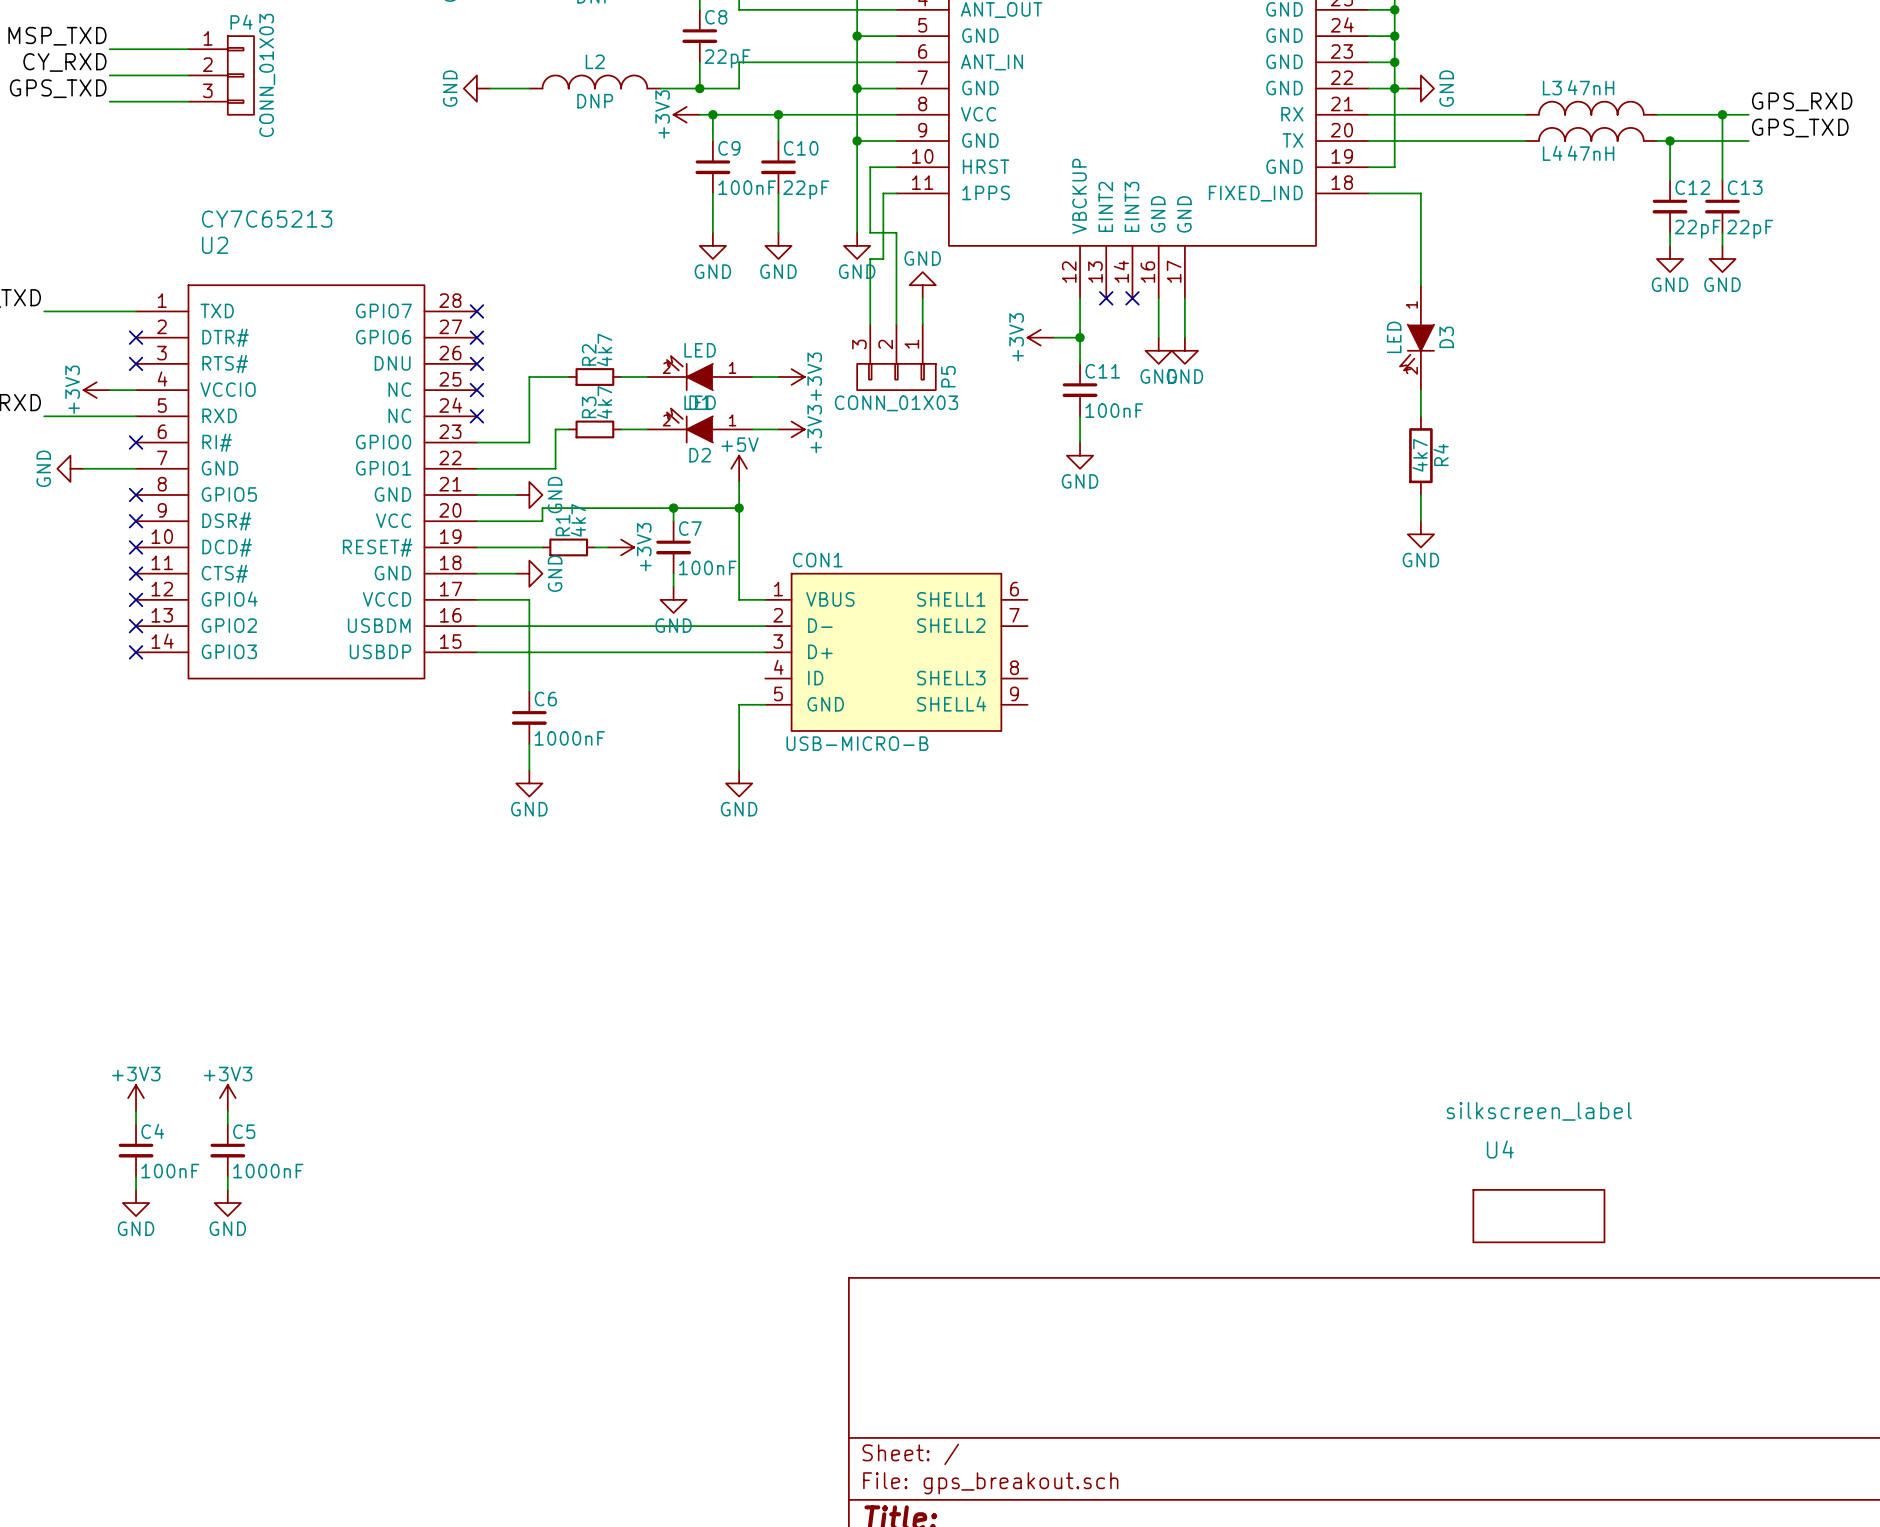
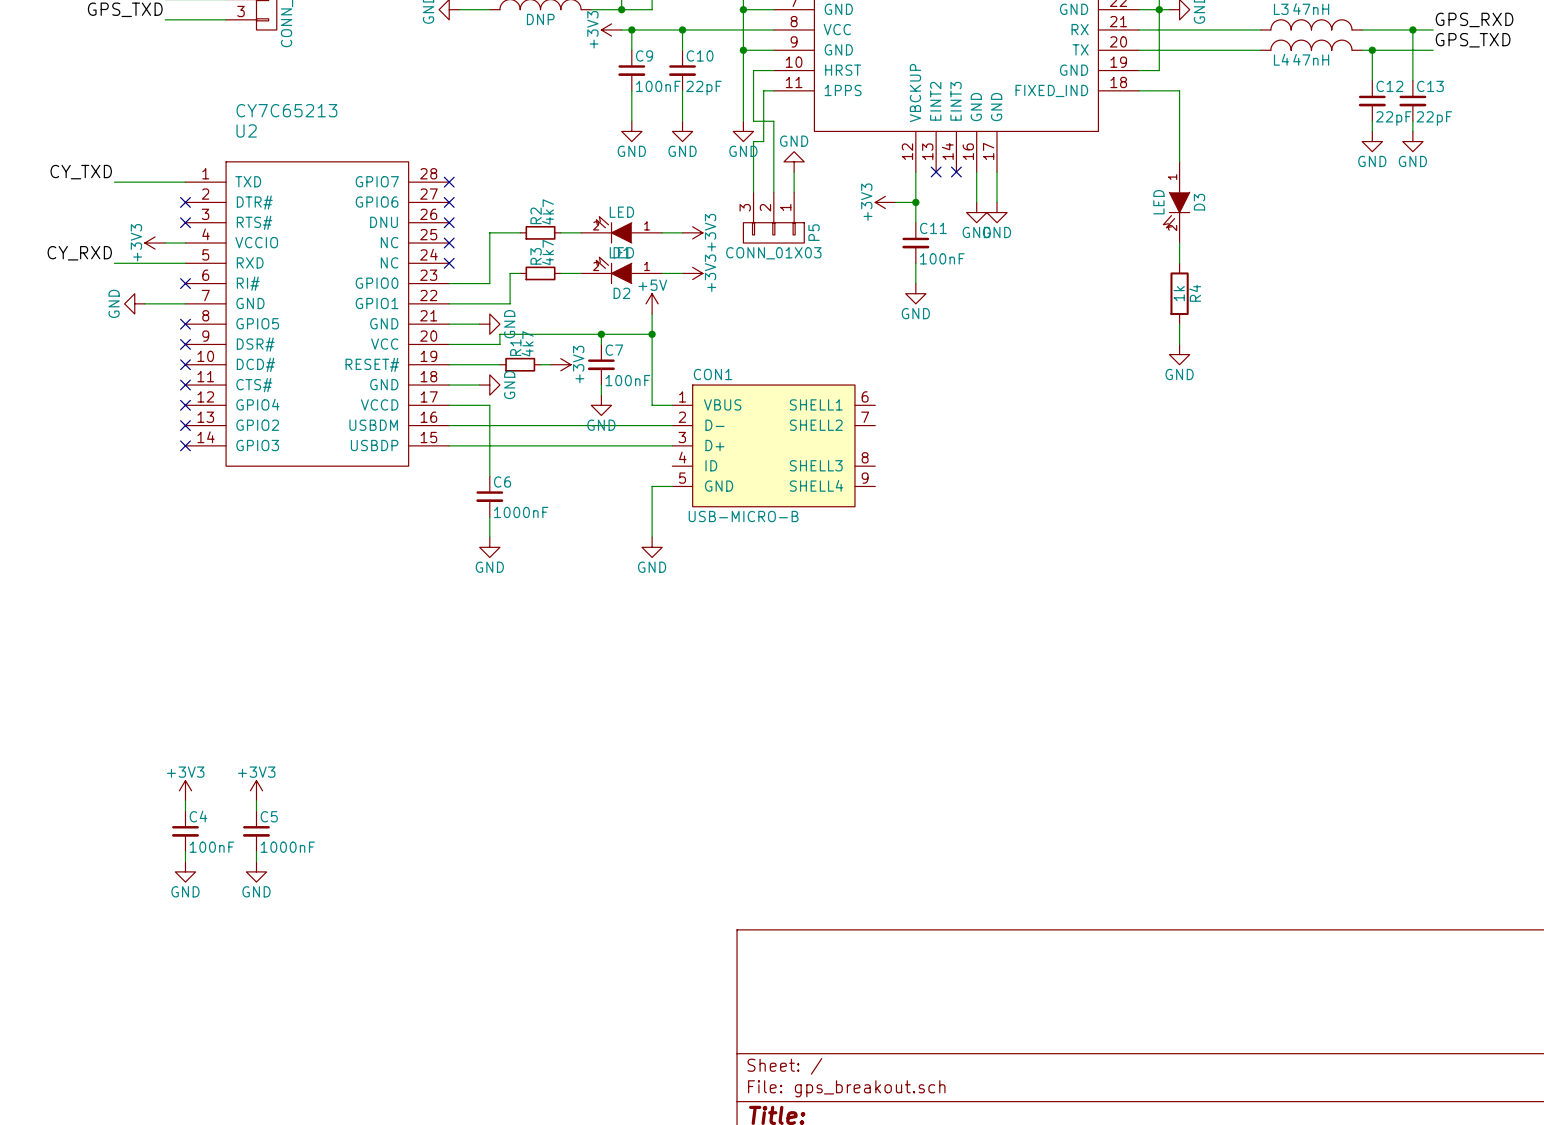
R4 value: 4k7 (1420, 455) -> 1k (1179, 293)
U4: silkscreen_label (1538, 1216) -> none

